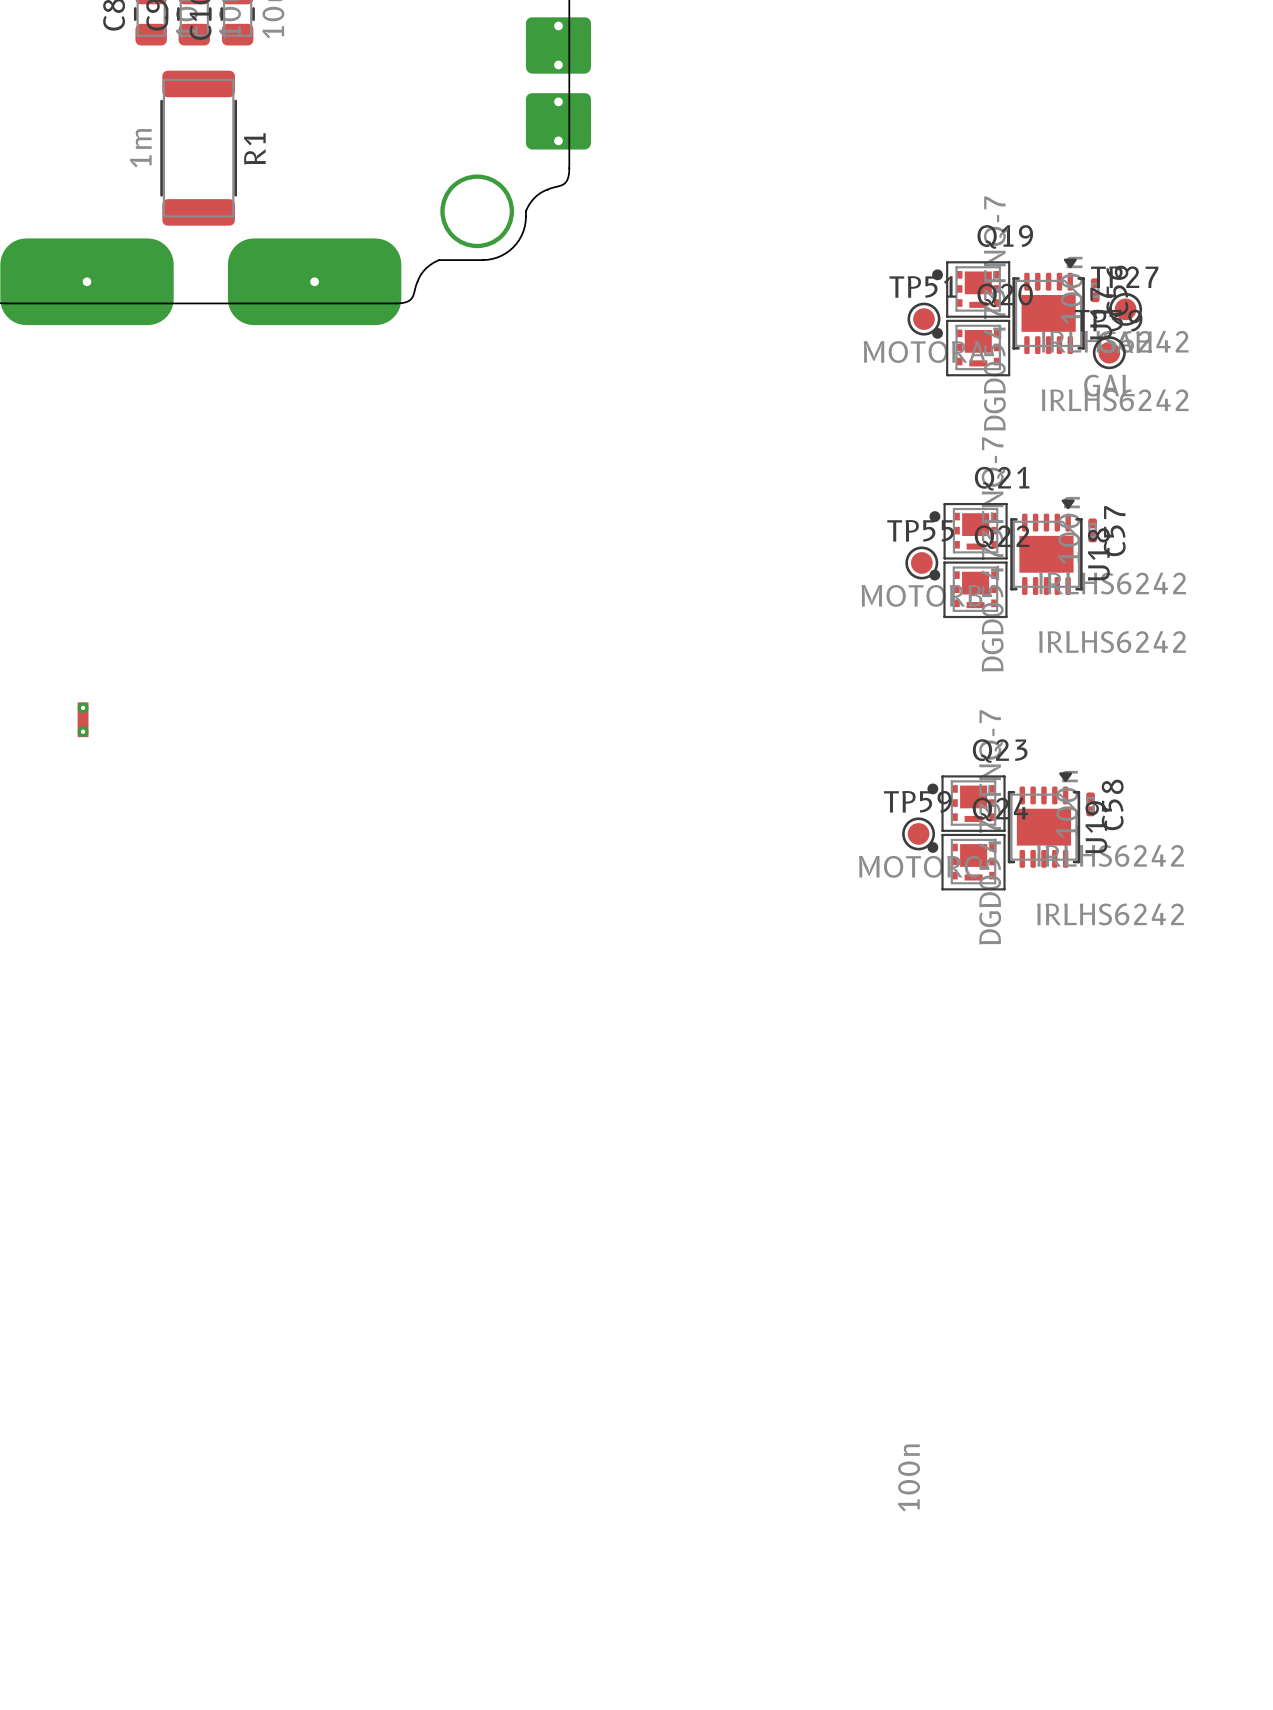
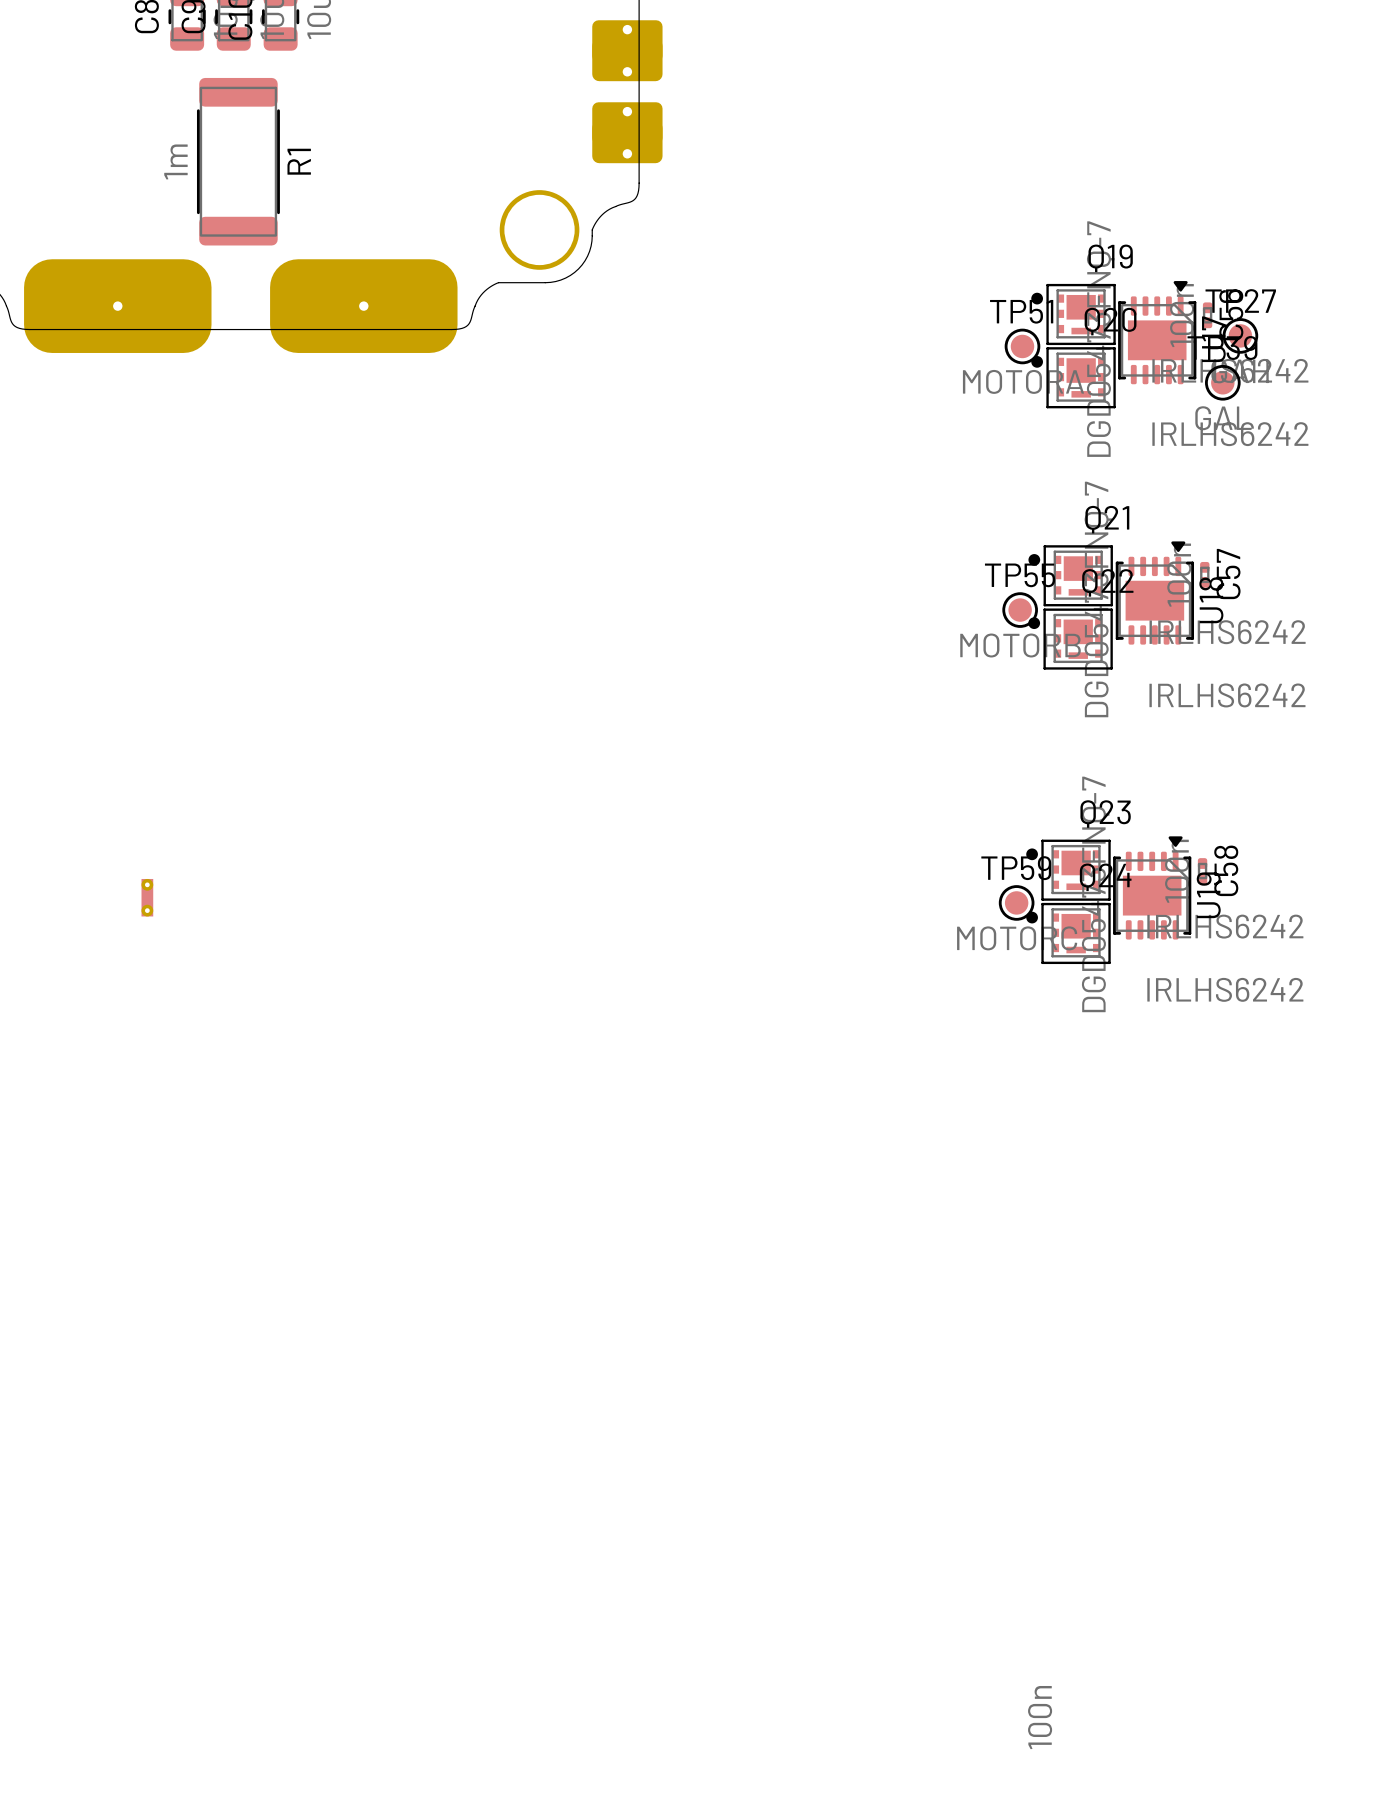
part position: (83, 719) -> (147, 897)
part position: (909, 1477) -> (1040, 1717)

